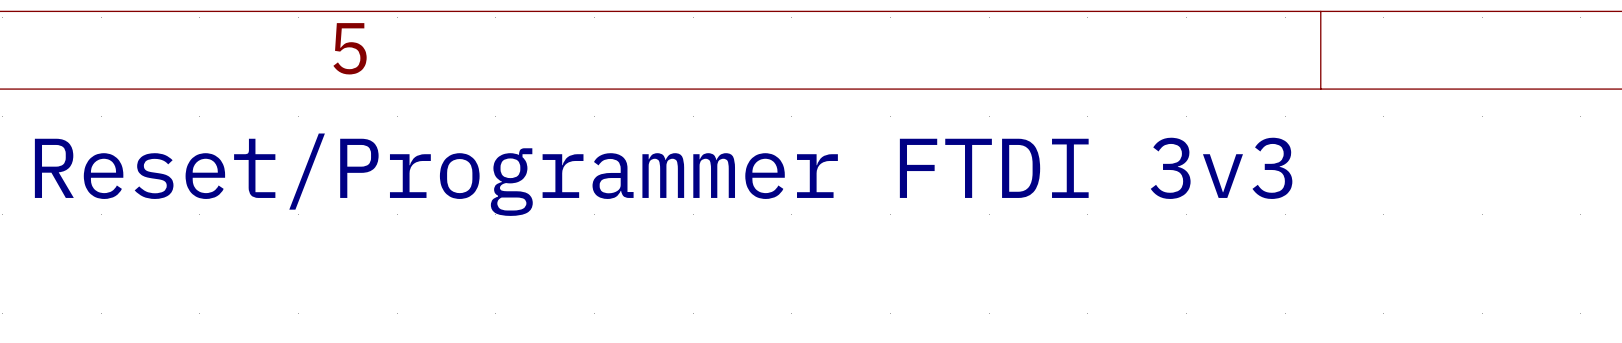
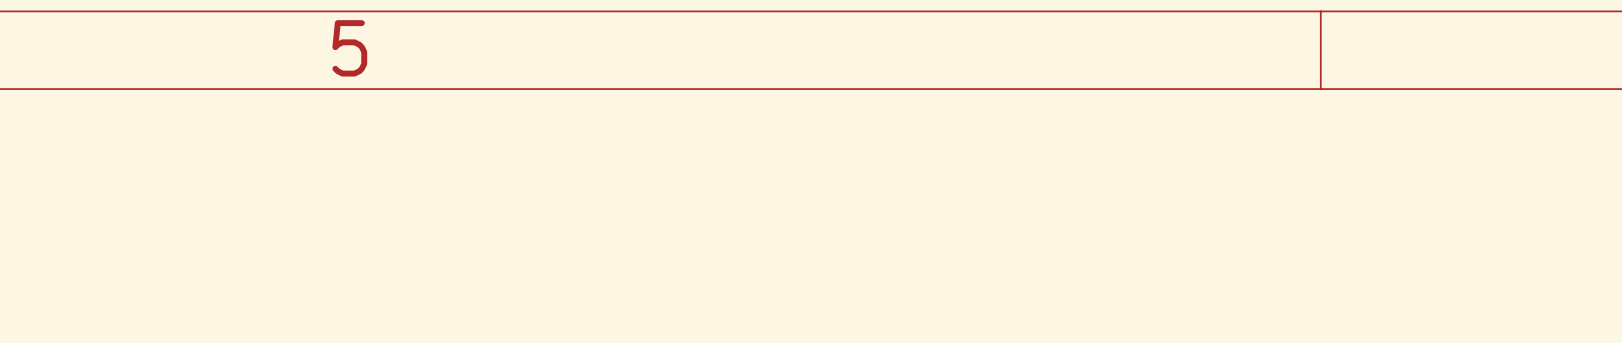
text: Reset/Programmer FTDI 3v3 (663, 174) -> none

